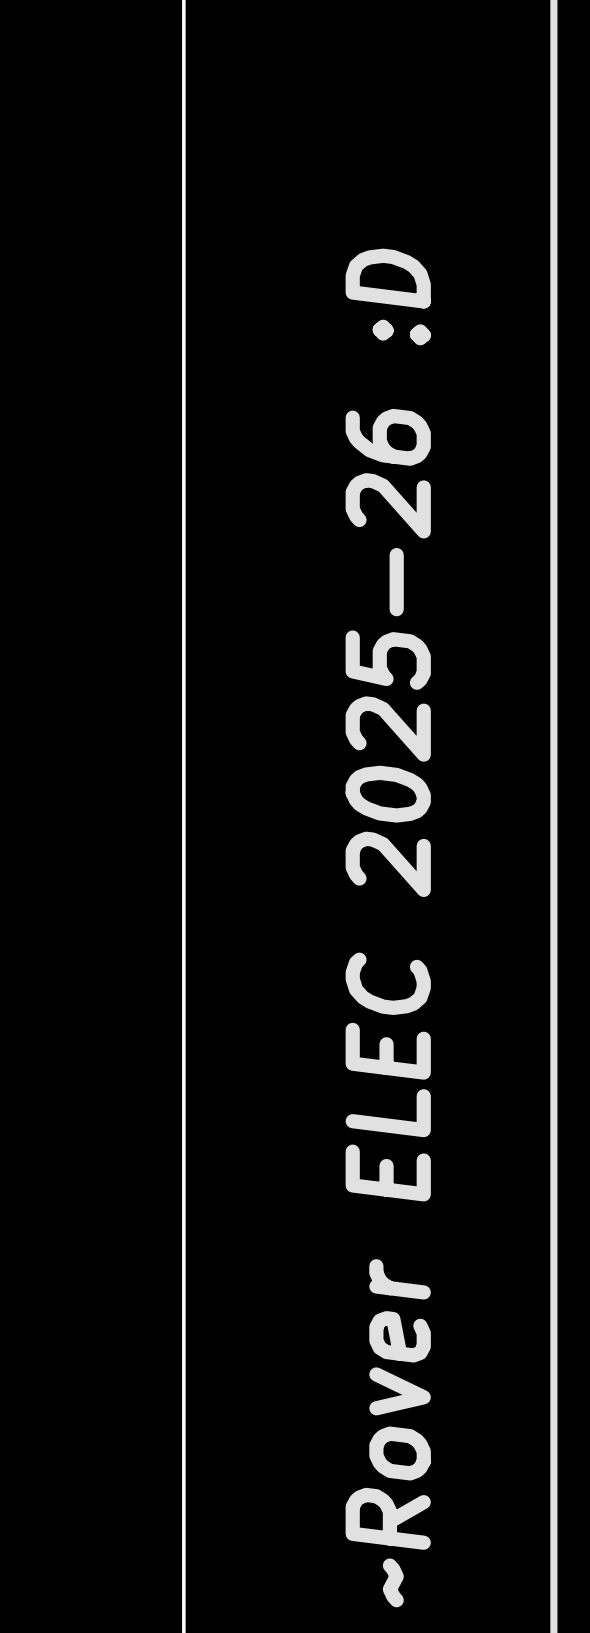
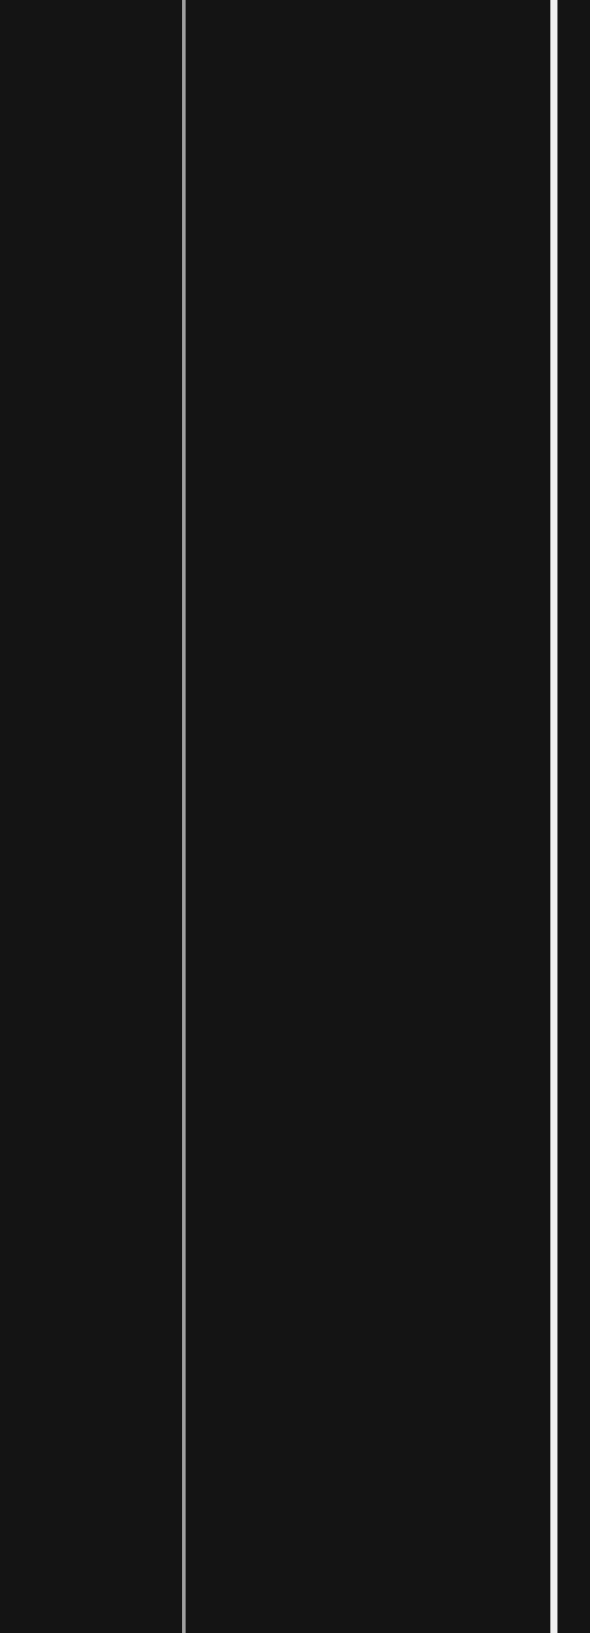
text: ~Rover ELEC 2025-26 :D (388, 927) -> none

